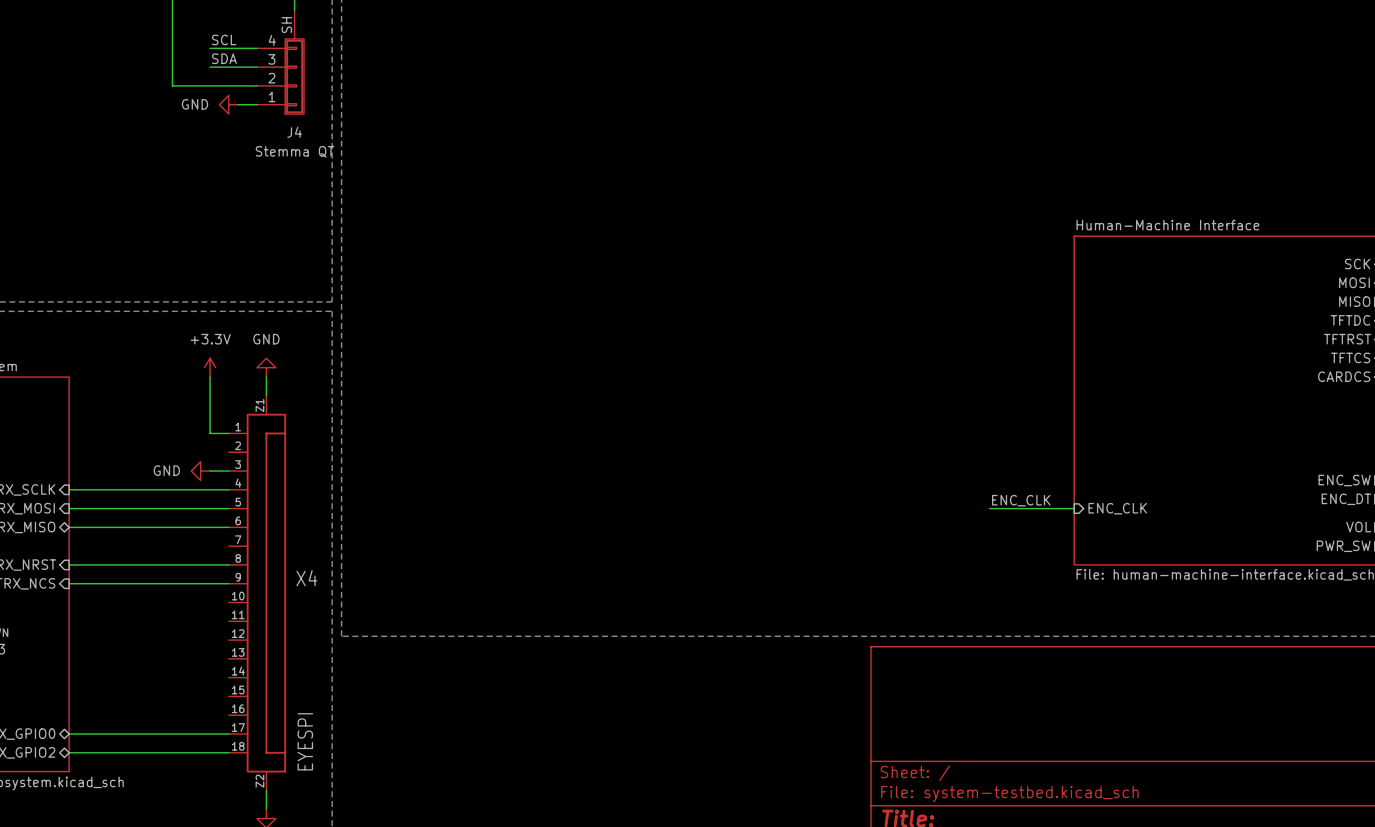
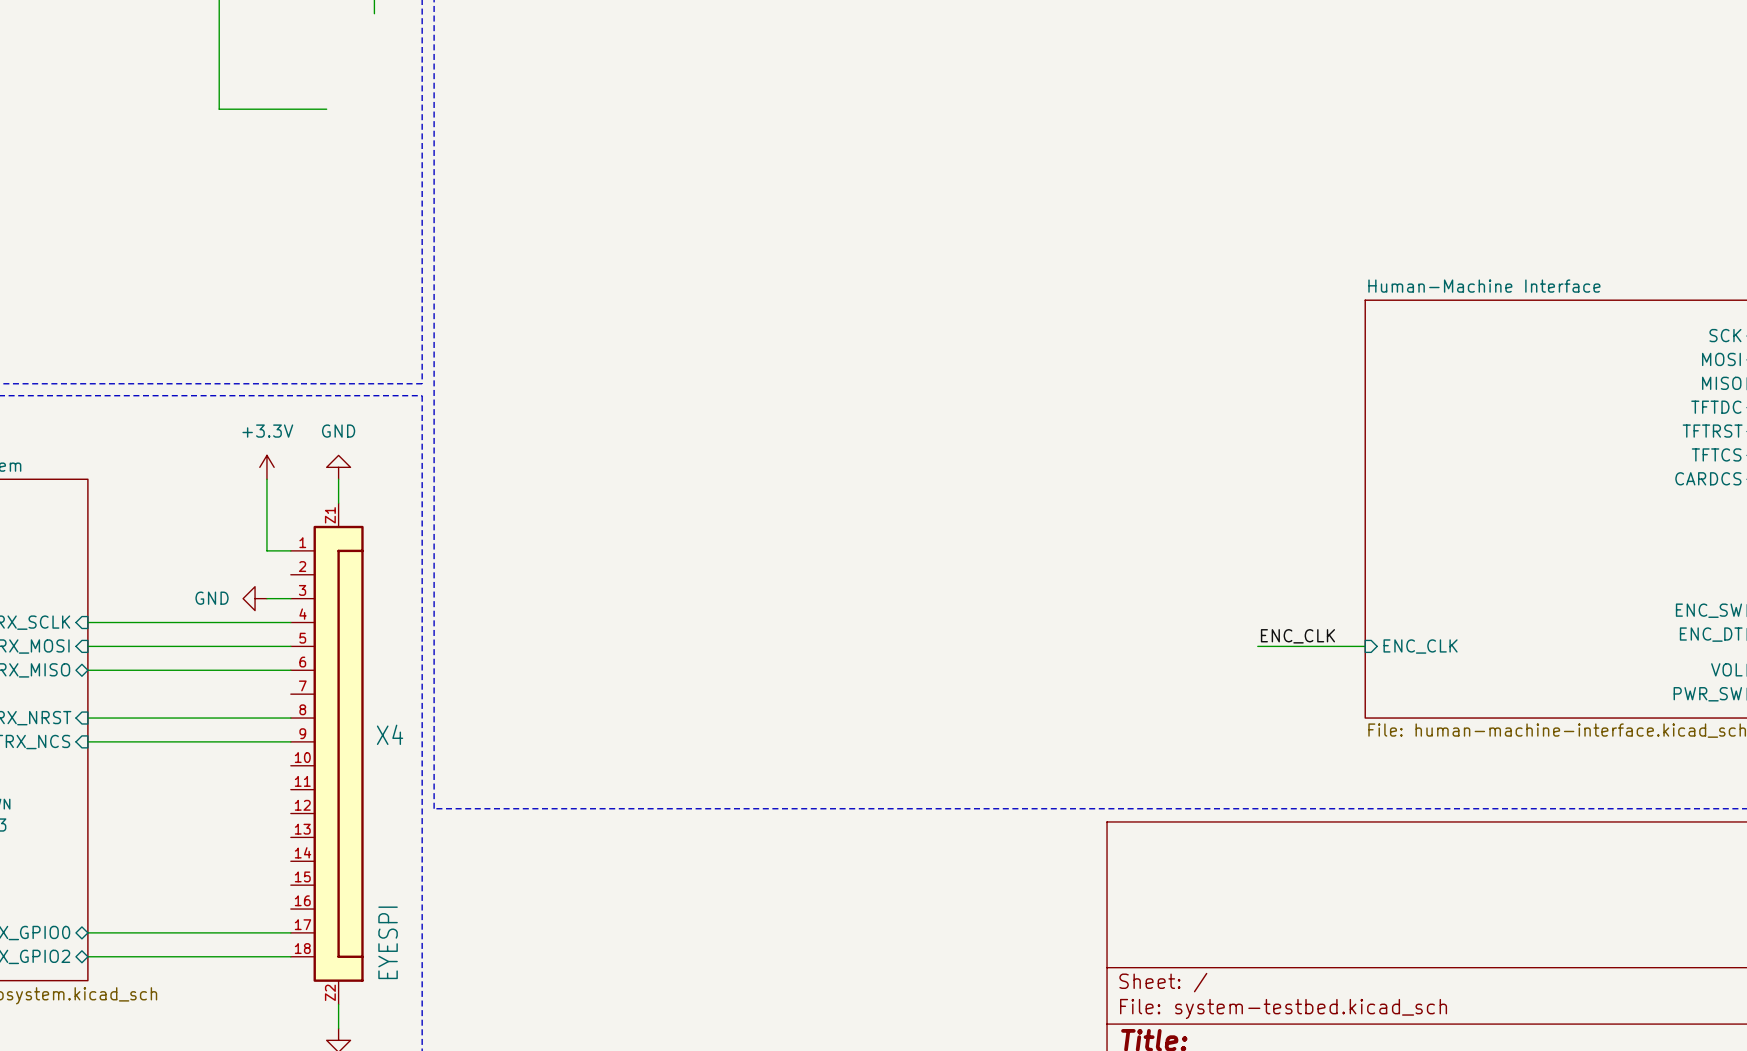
label: SCL (224, 39) -> none
wire: (210, 48) (257, 48) -> none
label: SDA (224, 58) -> none
J4: Stemma QT (280, 62) -> none
wire: (210, 67) (257, 67) -> none
power symbol: GND (228, 104) -> none
wire: (238, 104) (257, 104) -> none

